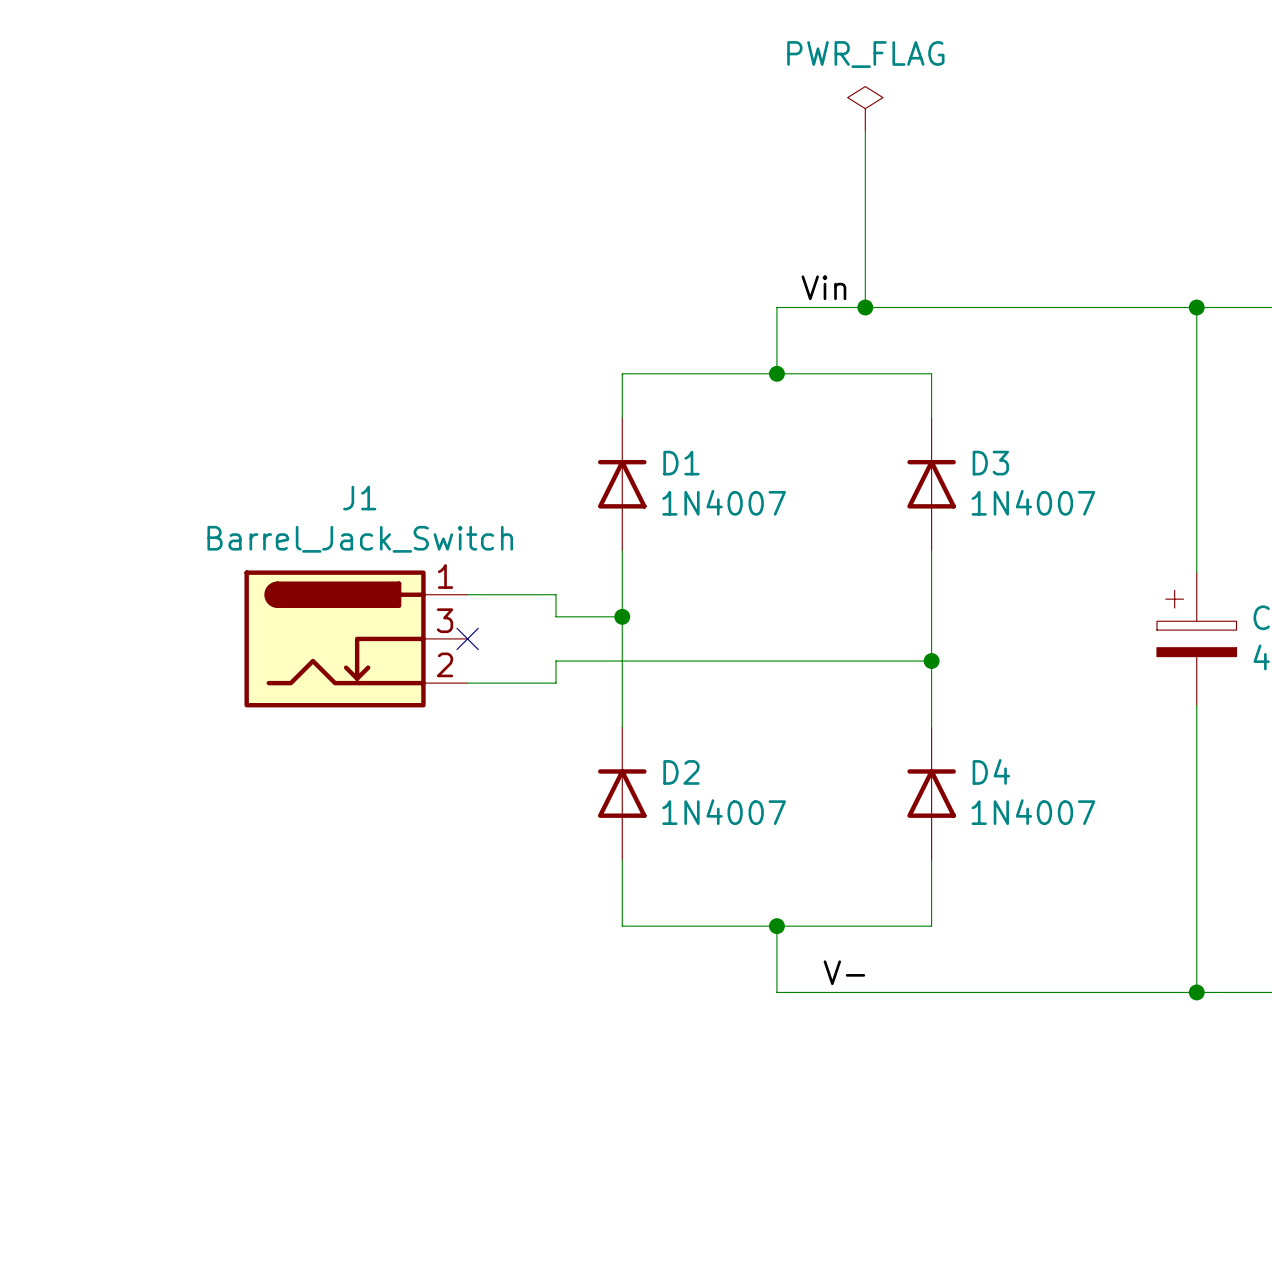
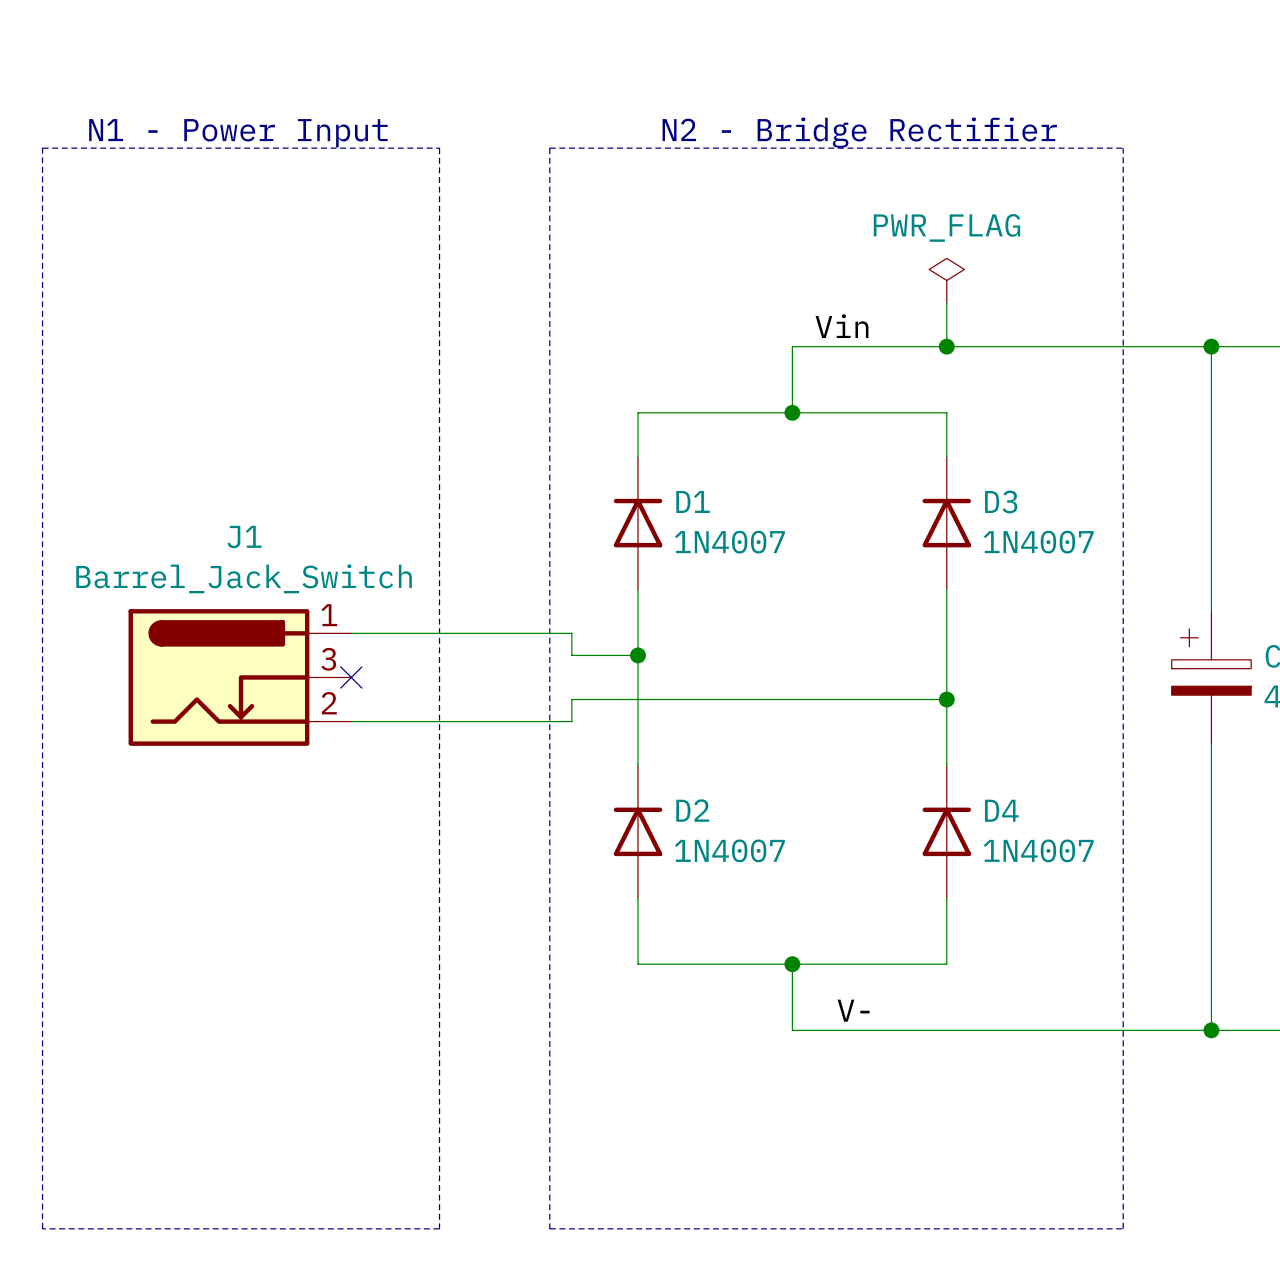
text: none -> N1 - Power Input (238, 133)
text: none -> N2 - Bridge Rectifier (859, 132)
line: none -> (42, 148) (42, 1228) (439, 1228) (439, 148) (42, 148)
line: none -> (549, 148) (1123, 148) (1123, 1228) (549, 1228) (549, 148)
power symbol position: PWR_FLAG (865, 108) -> PWR_FLAG (946, 280)
wire: (865, 130) (865, 307) -> none
wire: none -> (946, 302) (946, 346)
junction position: (865, 307) -> (946, 346)
no-connect mark: none -> (351, 677)
J1 position: (356, 638) -> (239, 677)
no-connect mark: (467, 638) -> none

